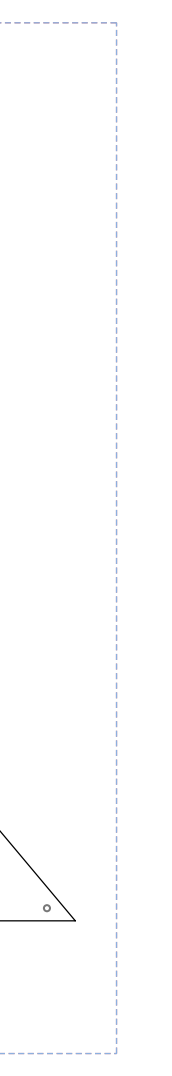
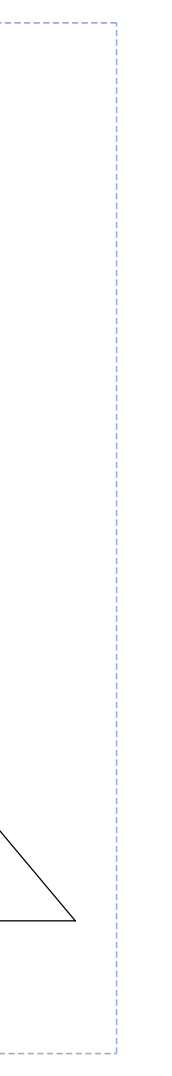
via: (46, 908) -> none

